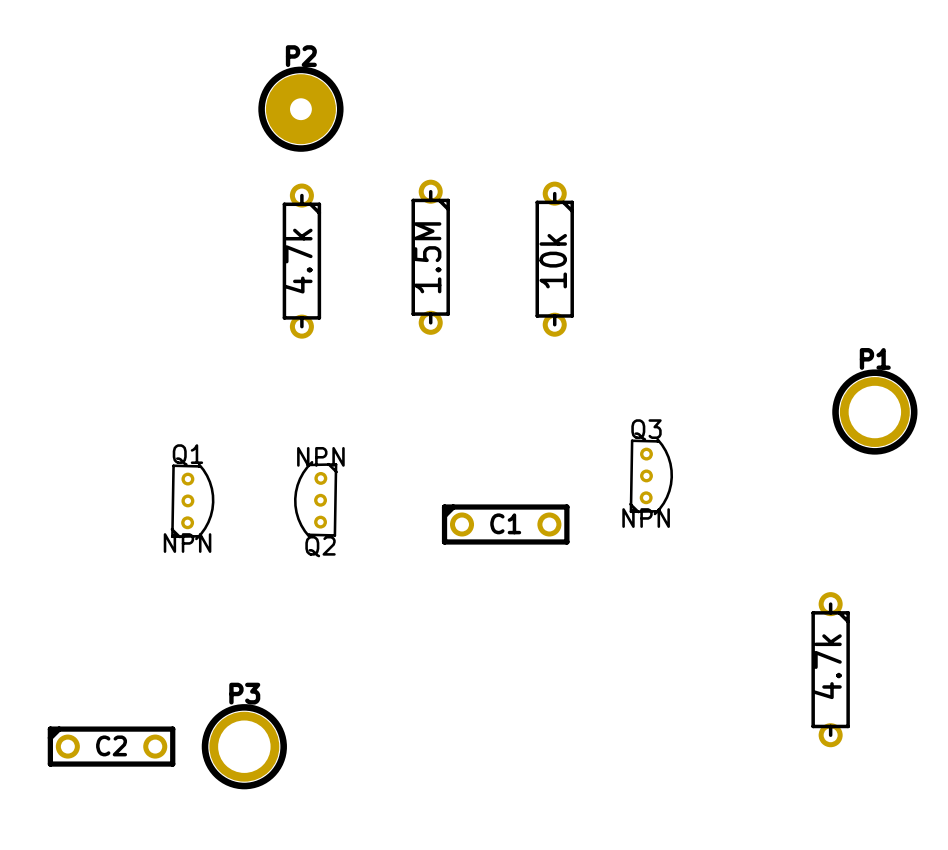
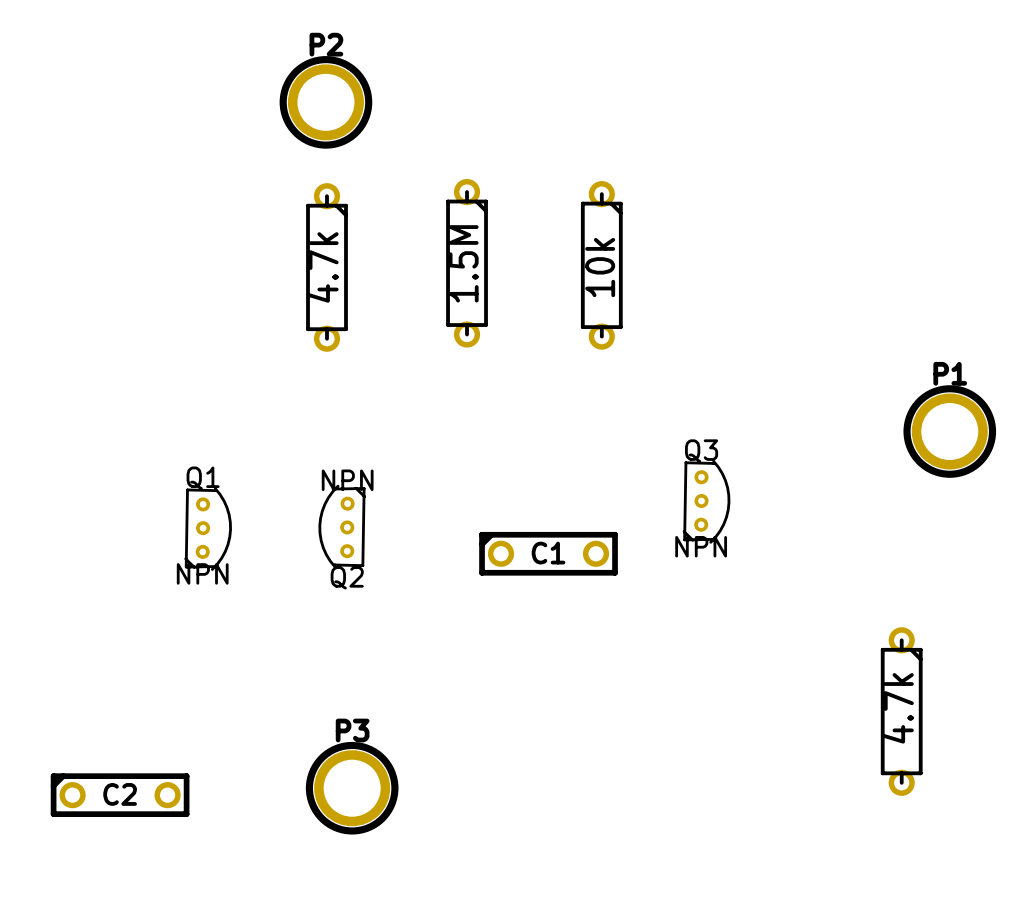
P2 footprint: [258, 66, 344, 152] -> [279, 56, 373, 149]
P3 position: (244, 746) -> (352, 788)

